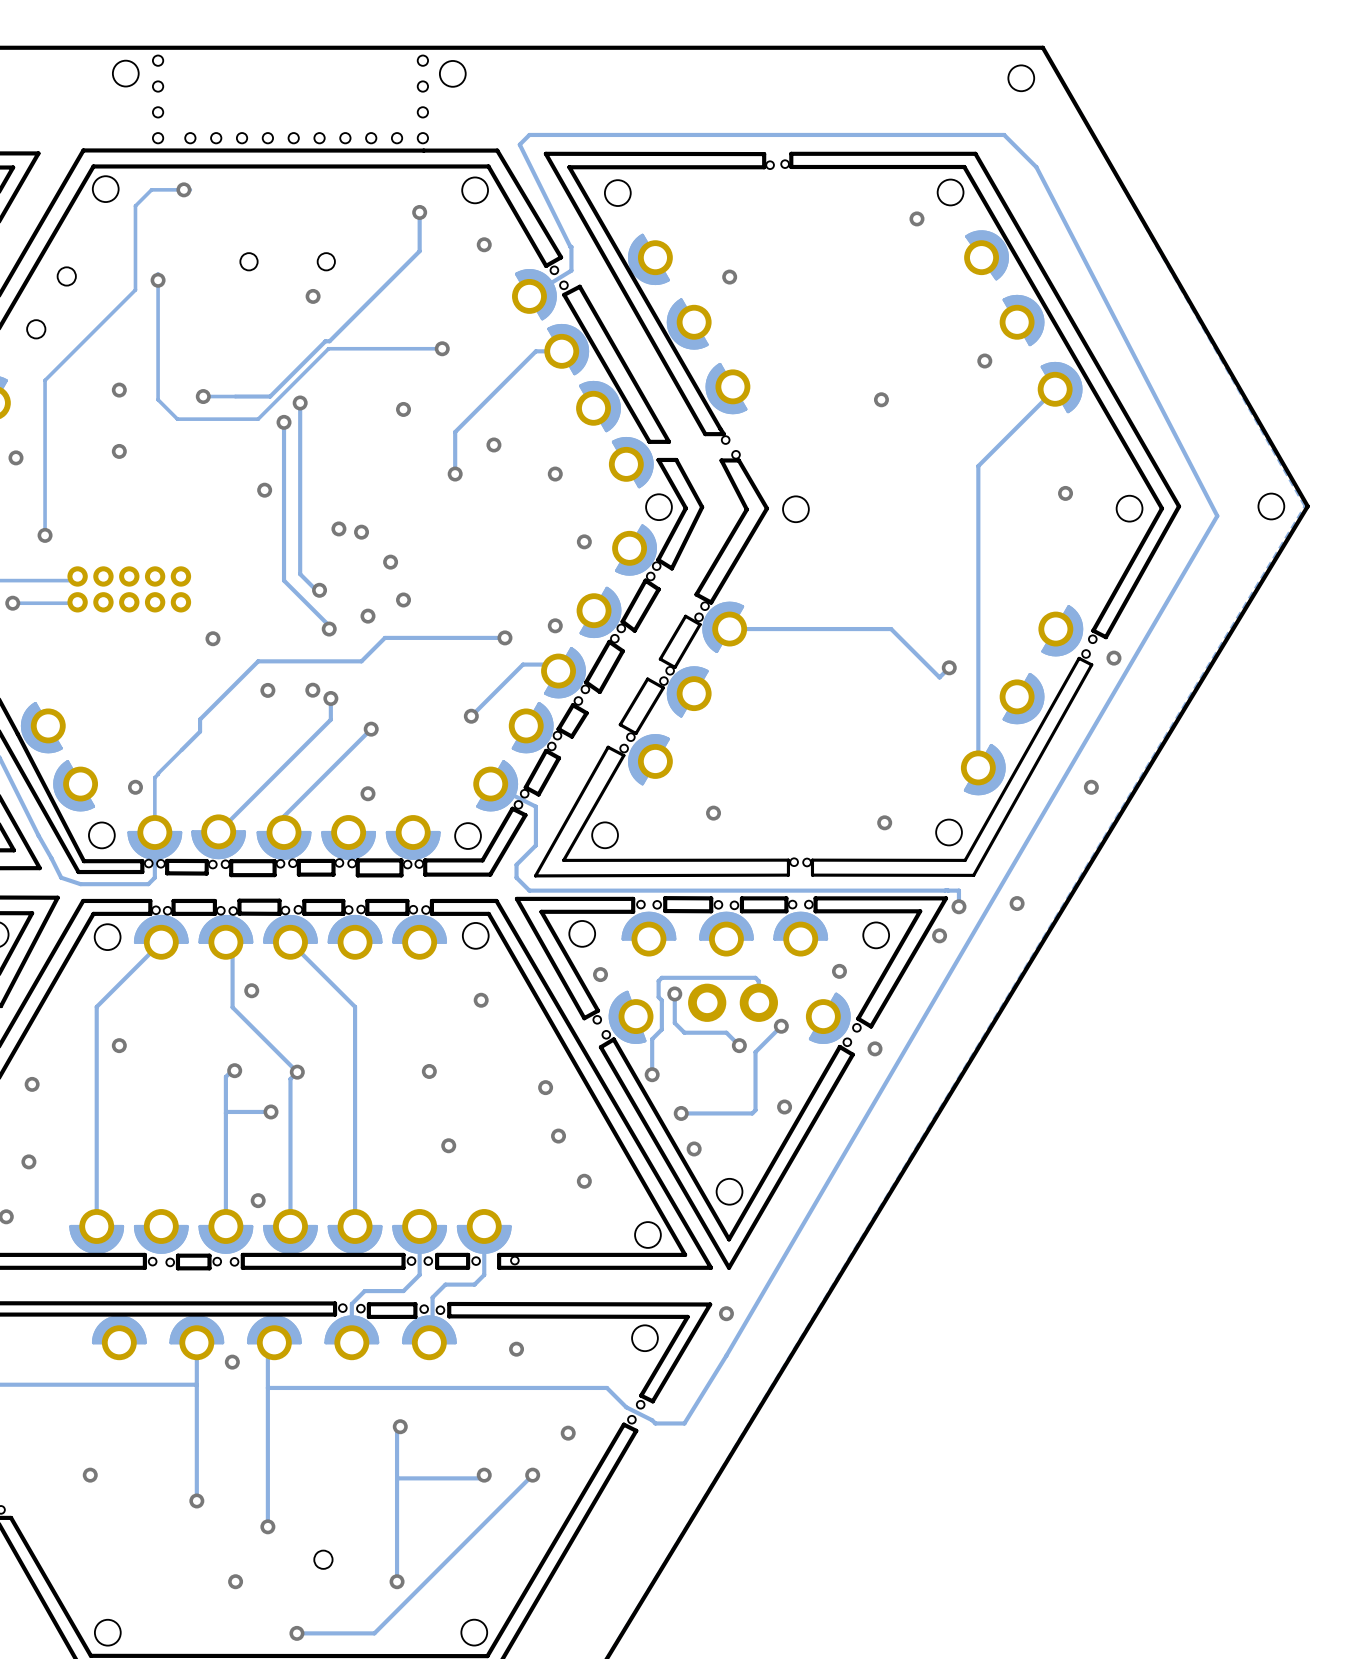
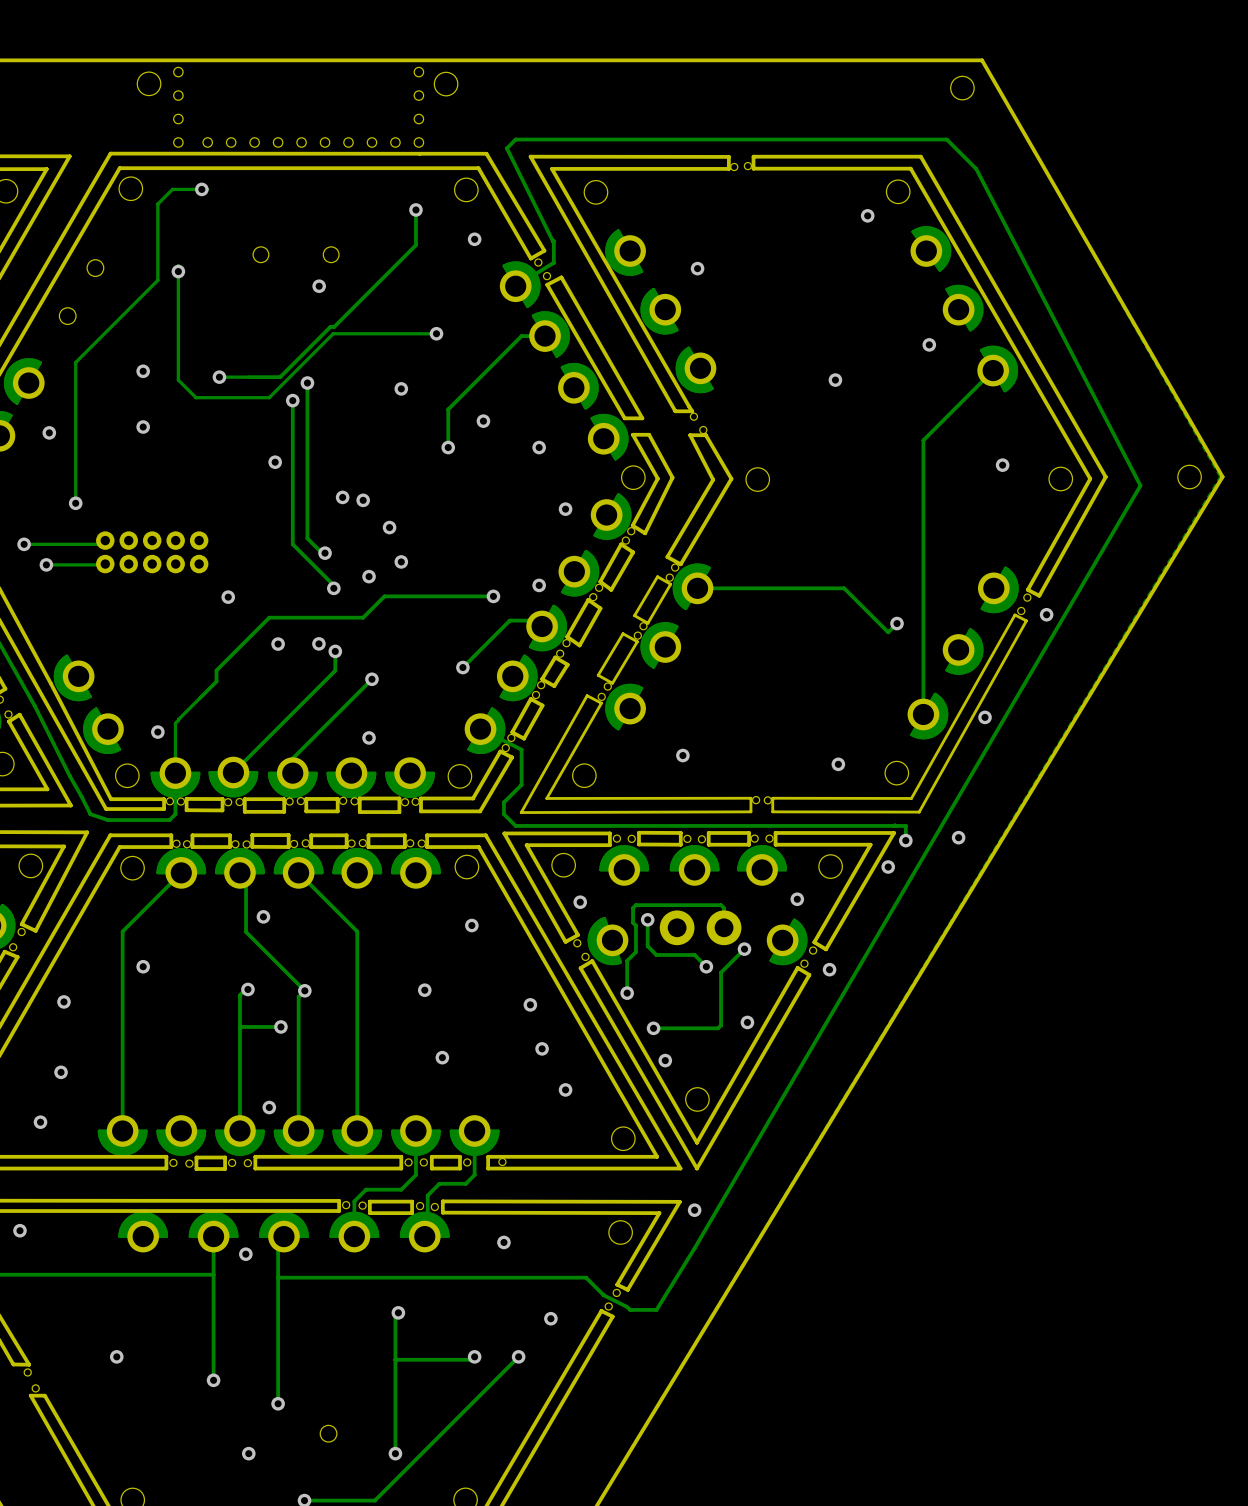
via position: (1091, 787) -> (985, 717)

